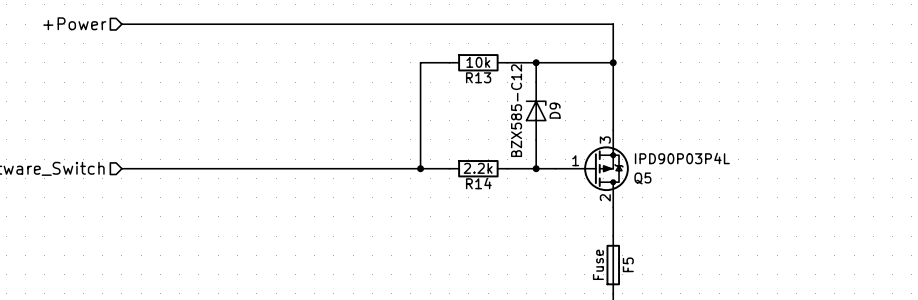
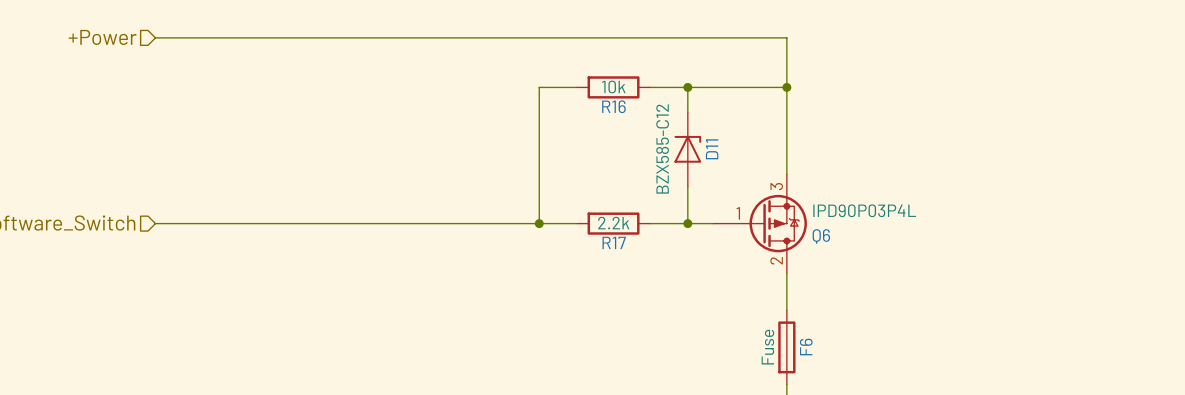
R13 name: R13 (478, 77) -> R16 (613, 106)
D9 name: D9 (555, 110) -> D11 (712, 149)
Q5 name: Q5 (642, 178) -> Q6 (821, 236)
R14 name: R14 (478, 183) -> R17 (614, 242)
F5 name: F5 (628, 264) -> F6 (806, 347)

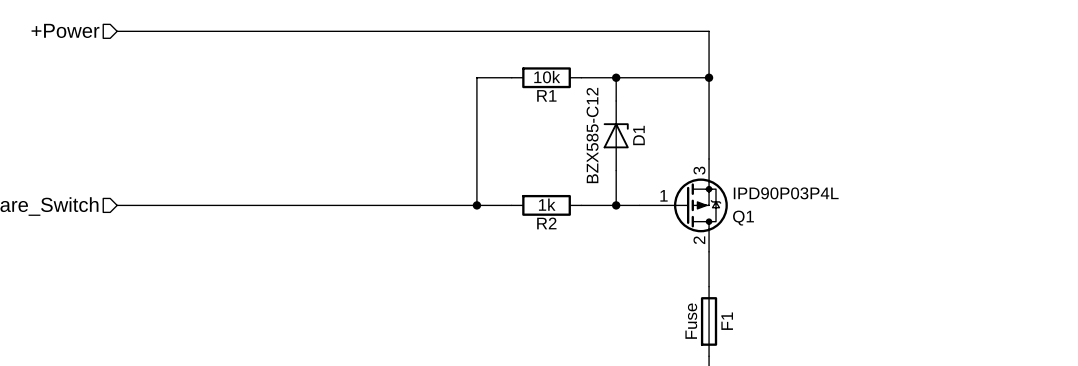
R16 name: R16 (613, 106) -> R1 (546, 95)
D11 name: D11 (712, 149) -> D1 (638, 135)
R17 value: 2.2k (613, 223) -> 1k (547, 204)
Q6 name: Q6 (821, 236) -> Q1 (743, 218)
R17 name: R17 (614, 242) -> R2 (546, 223)
F6 name: F6 (806, 347) -> F1 (727, 321)

